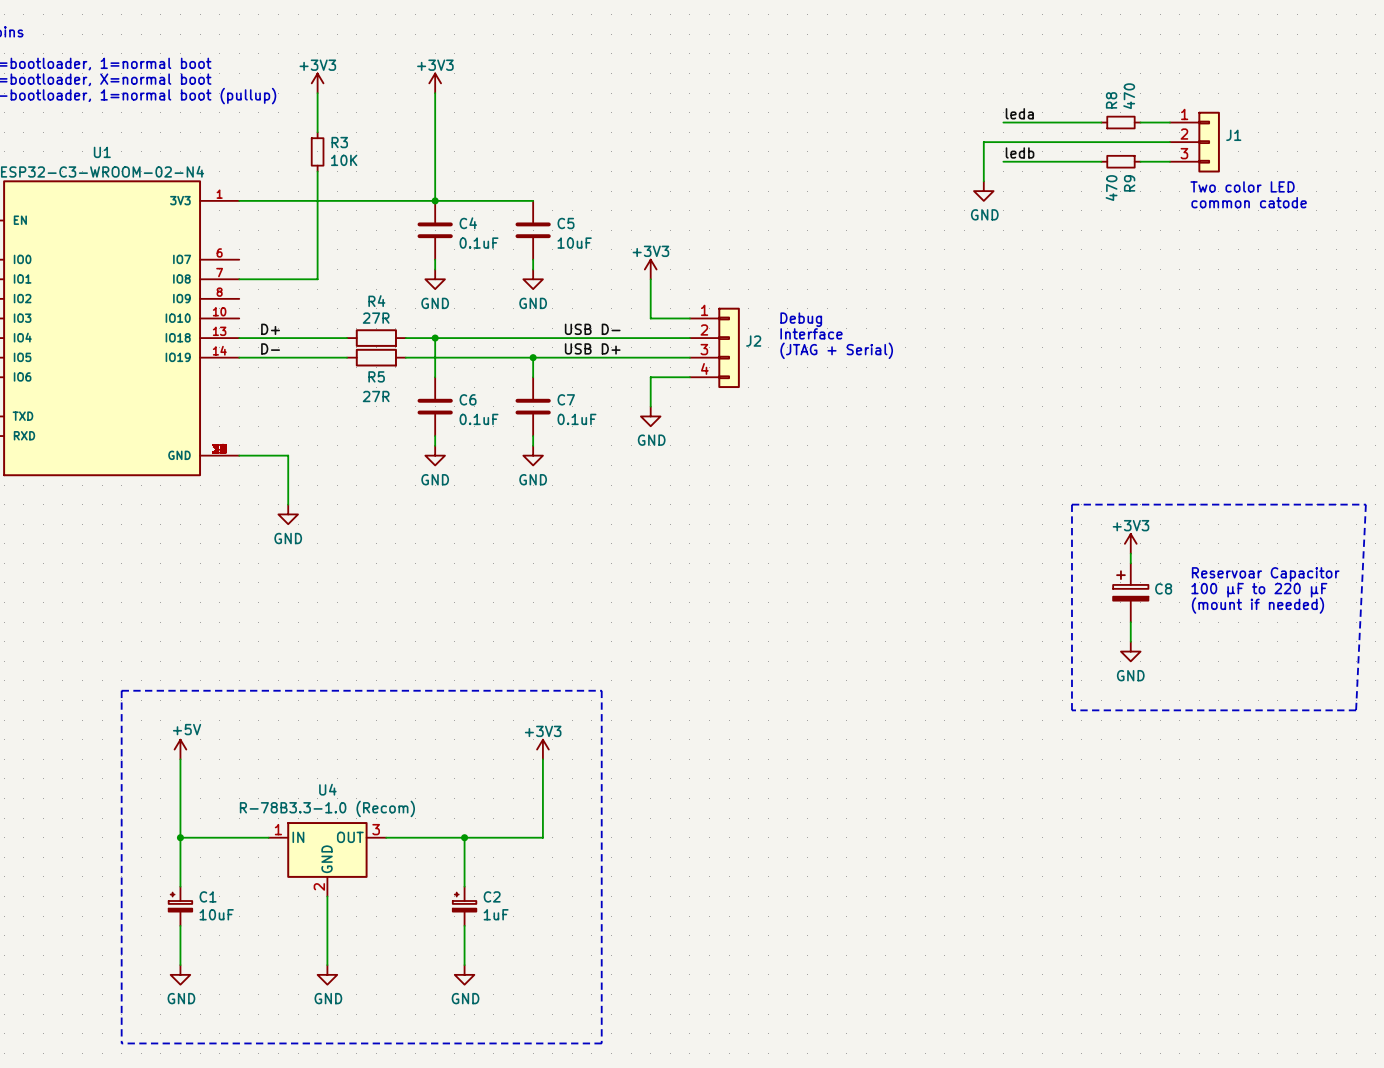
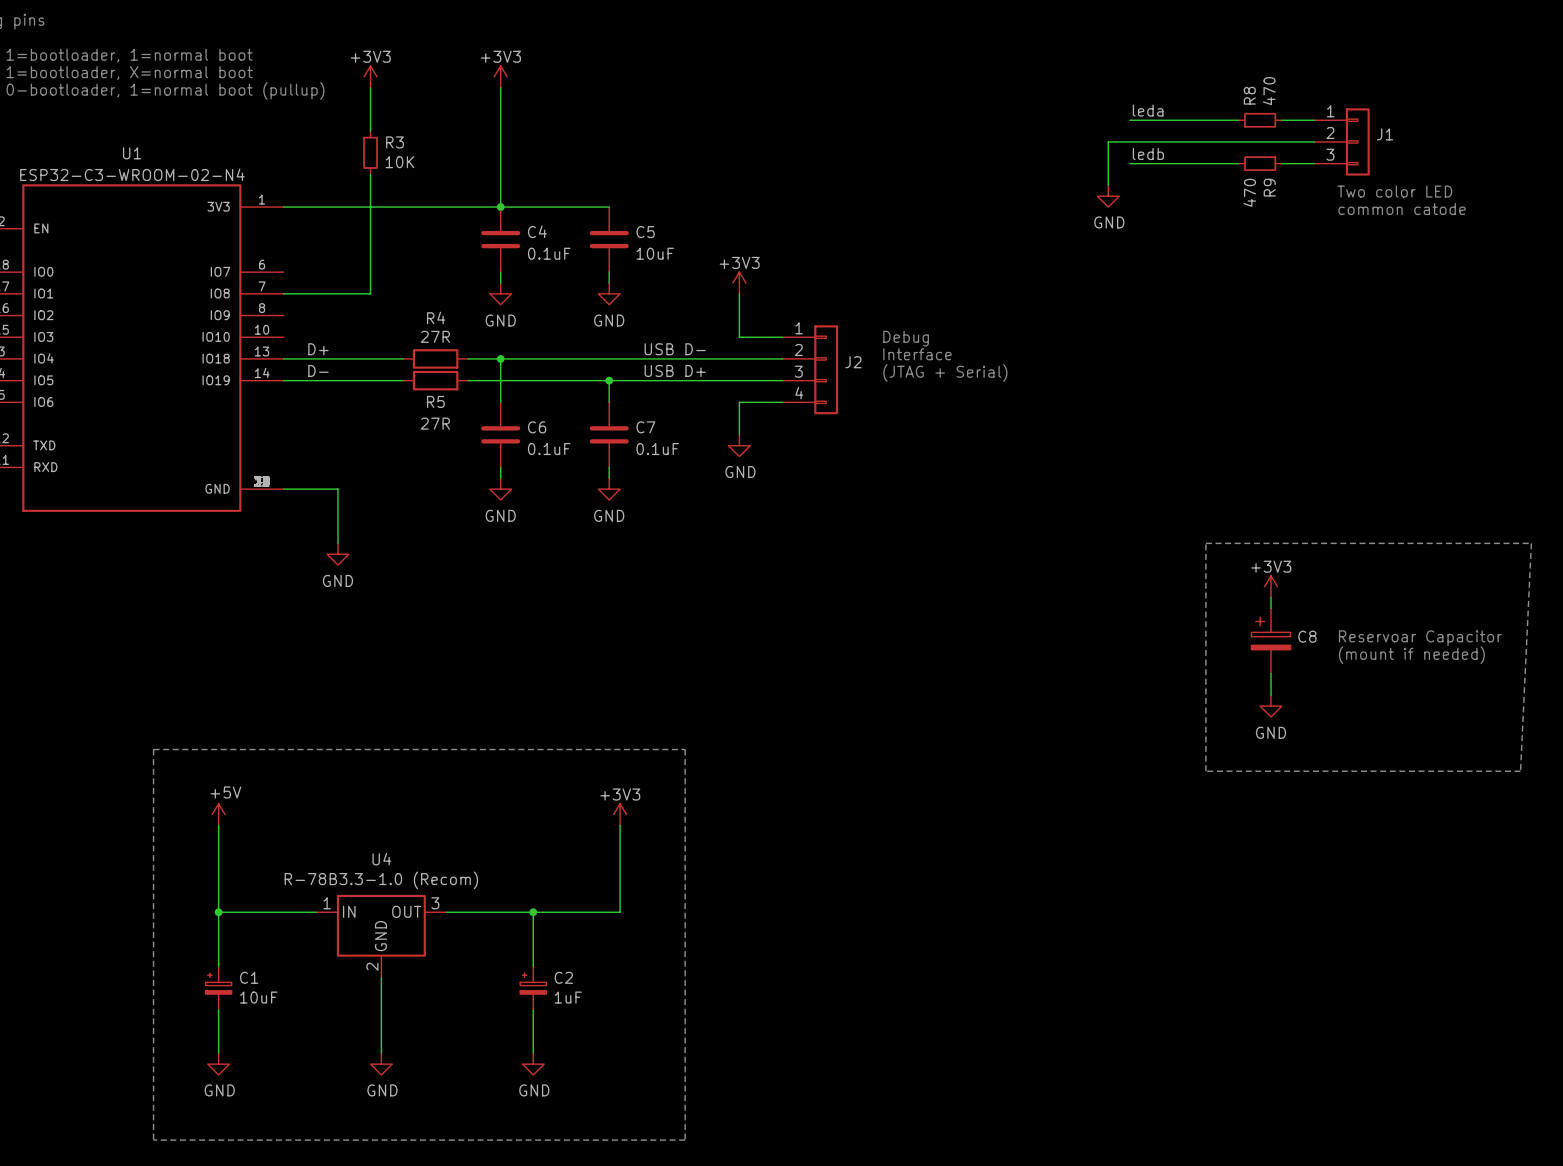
text: Reservoar Capacitor (1265, 574) -> none
text: 100 µF to 220 µF (1259, 590) -> Reservoar Capacitor (1420, 638)

